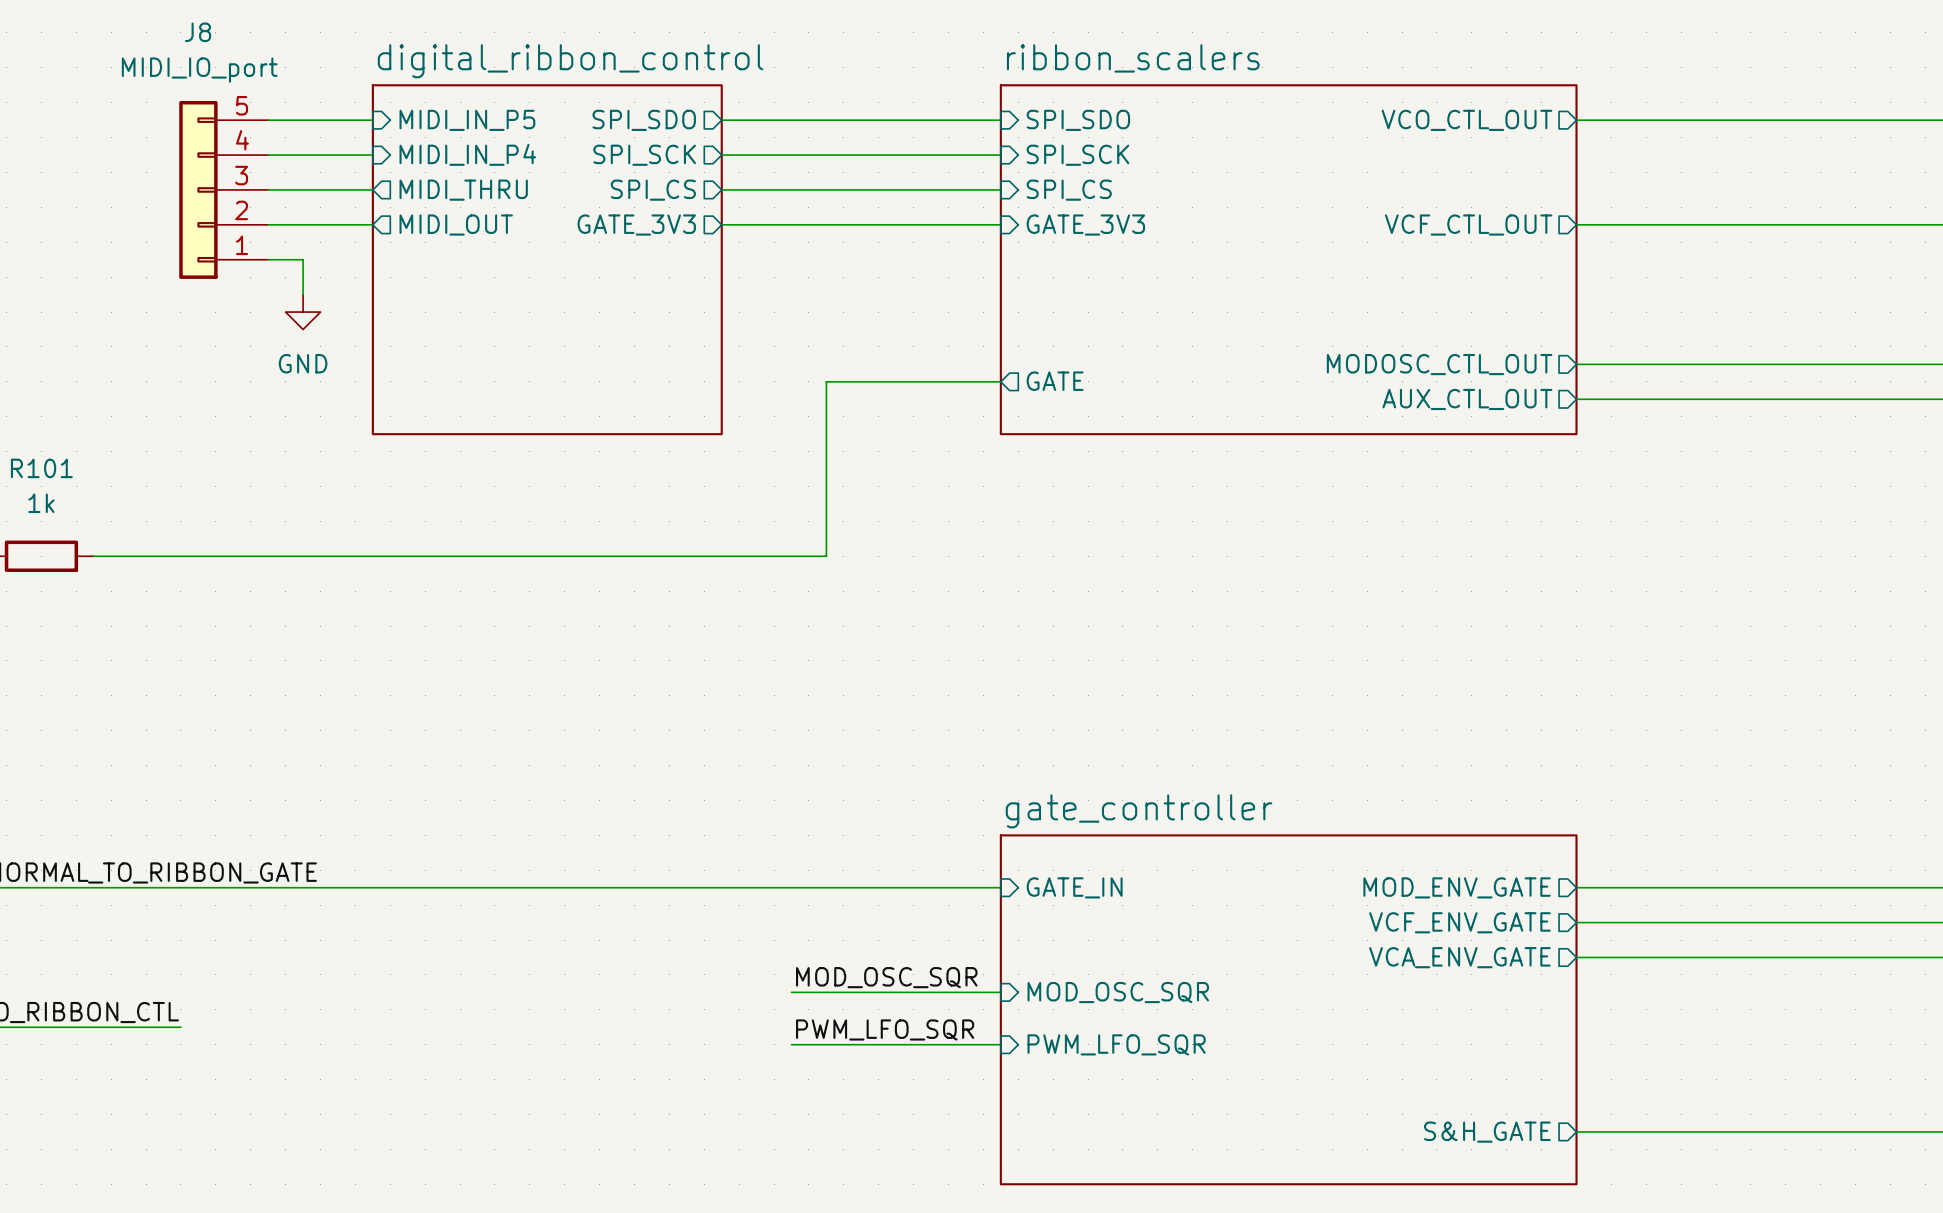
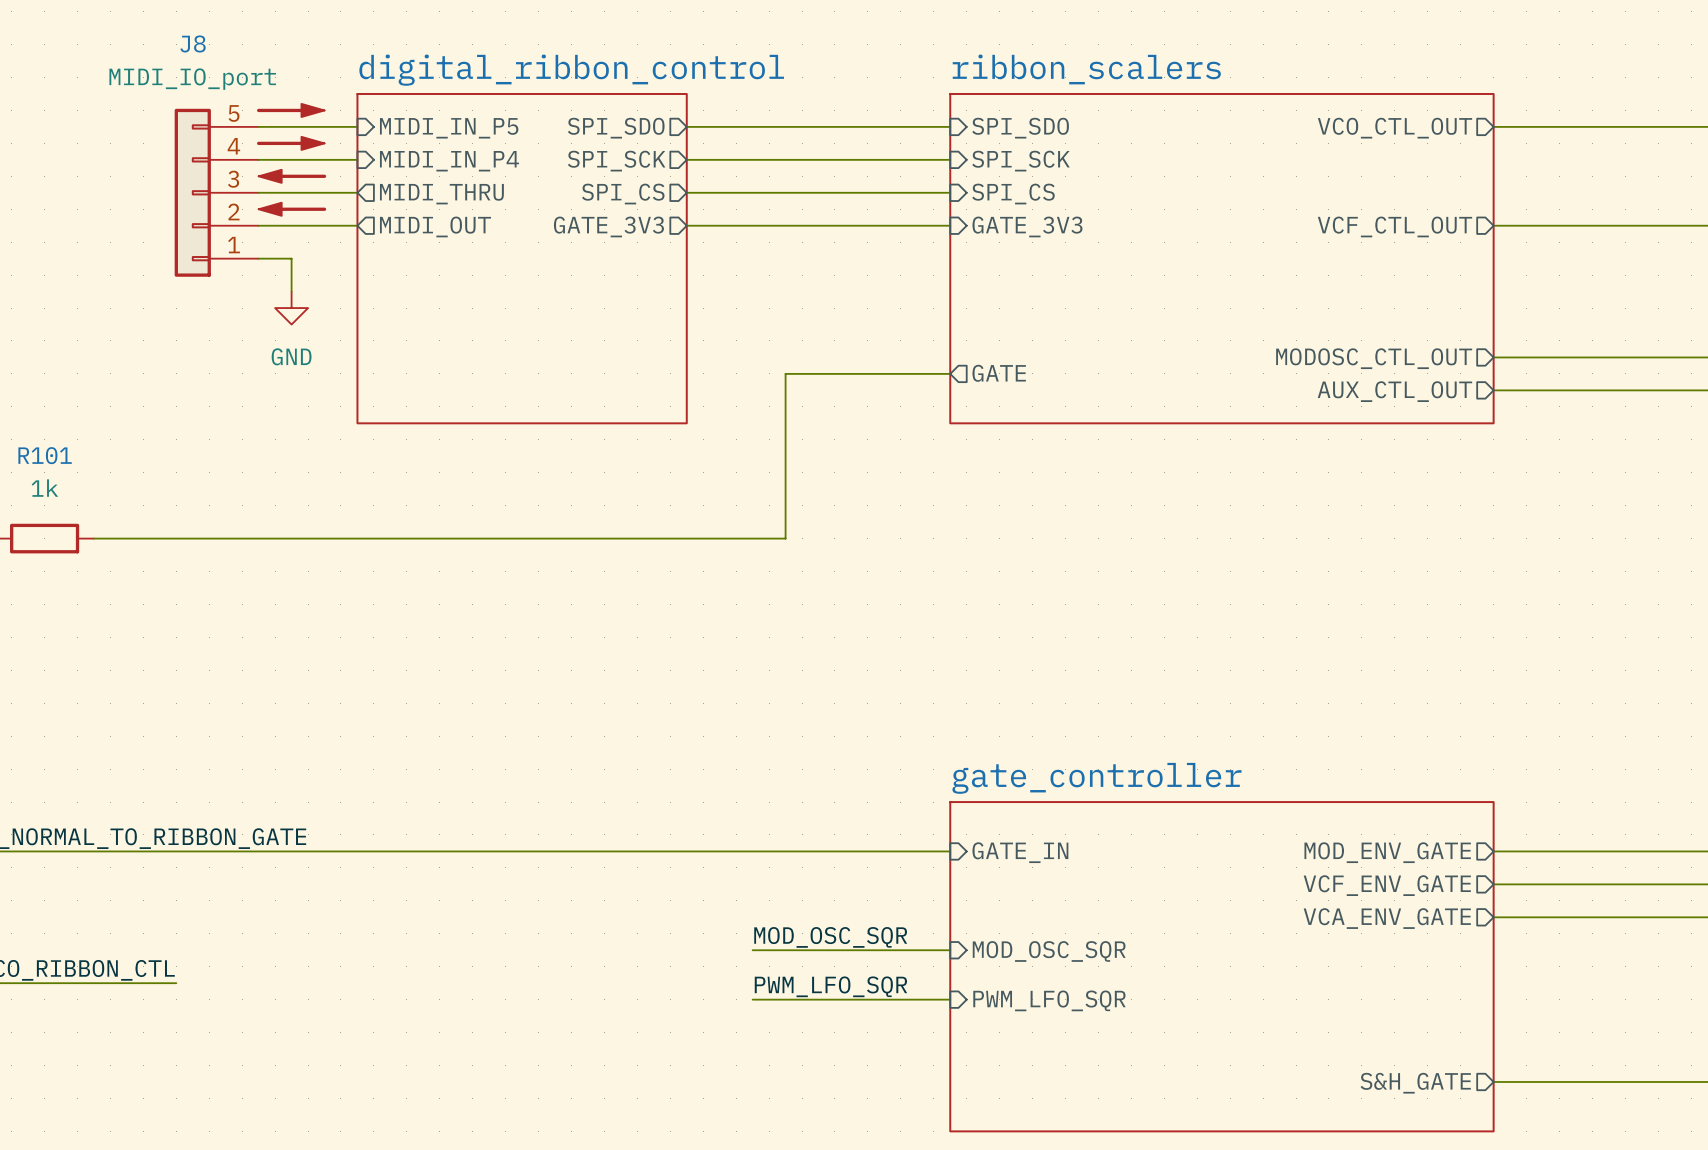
power symbol: none -> (290, 110)
power symbol: none -> (290, 143)
power symbol: none -> (292, 176)
power symbol: none -> (292, 209)

